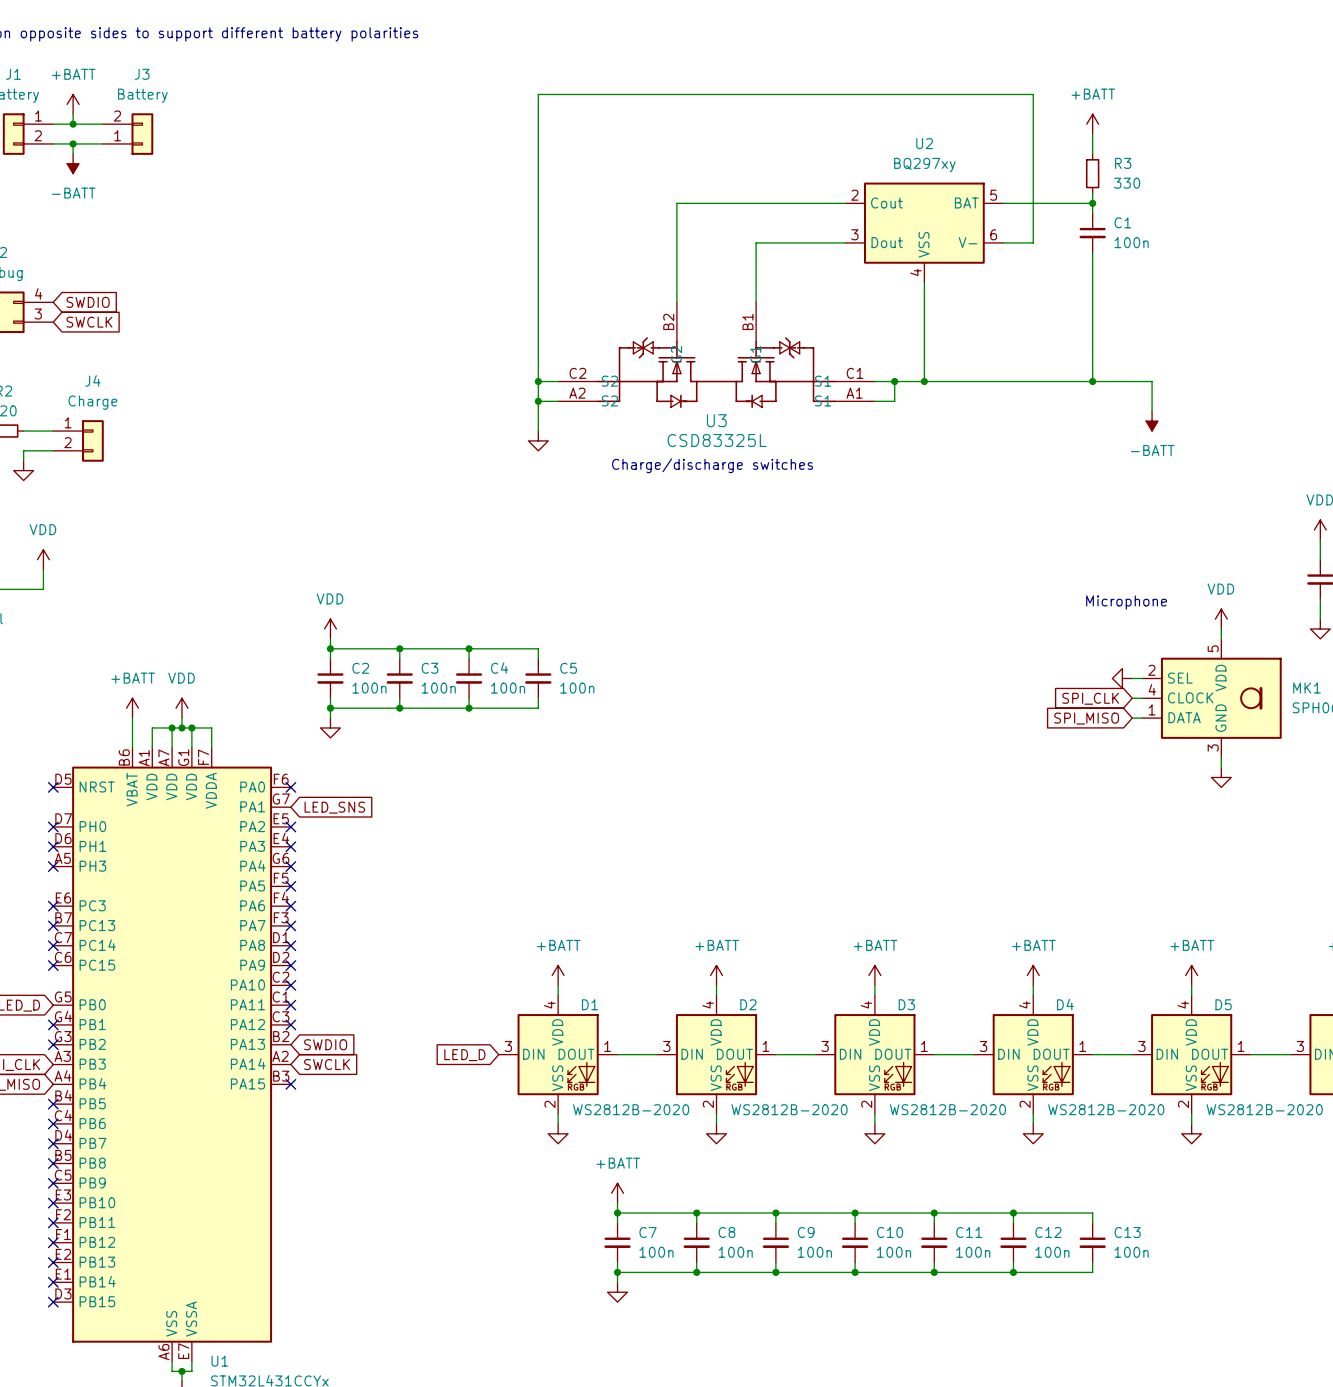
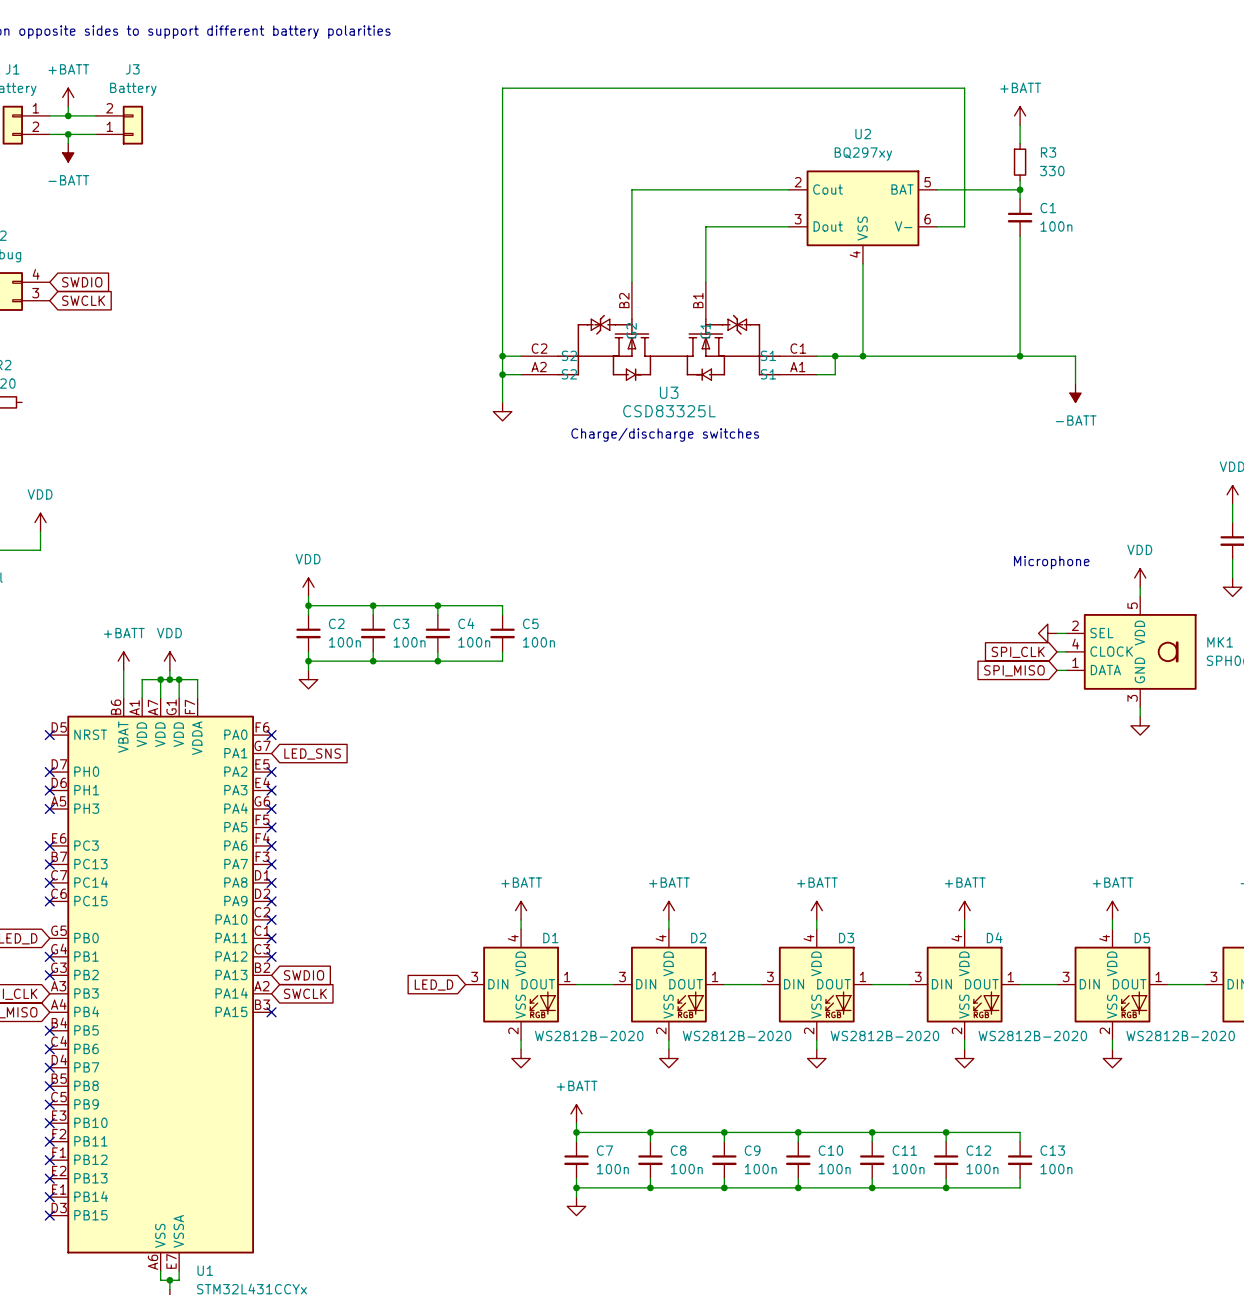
wire: (23, 431) (53, 431) -> none
J4: Charge (78, 440) -> none
wire: (53, 450) (23, 450) (23, 460) -> none
power symbol: (23, 470) -> none

